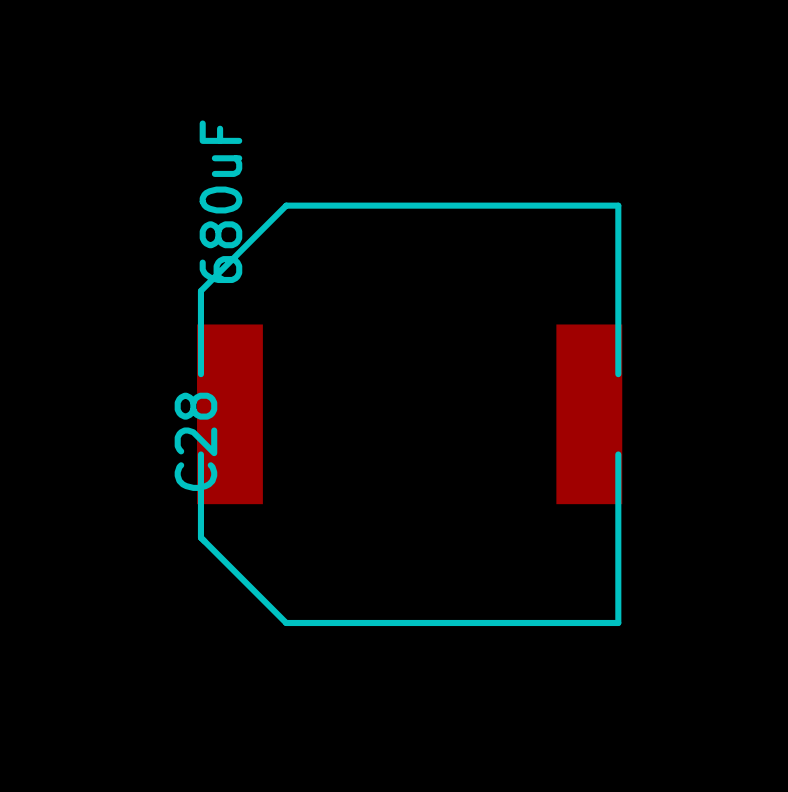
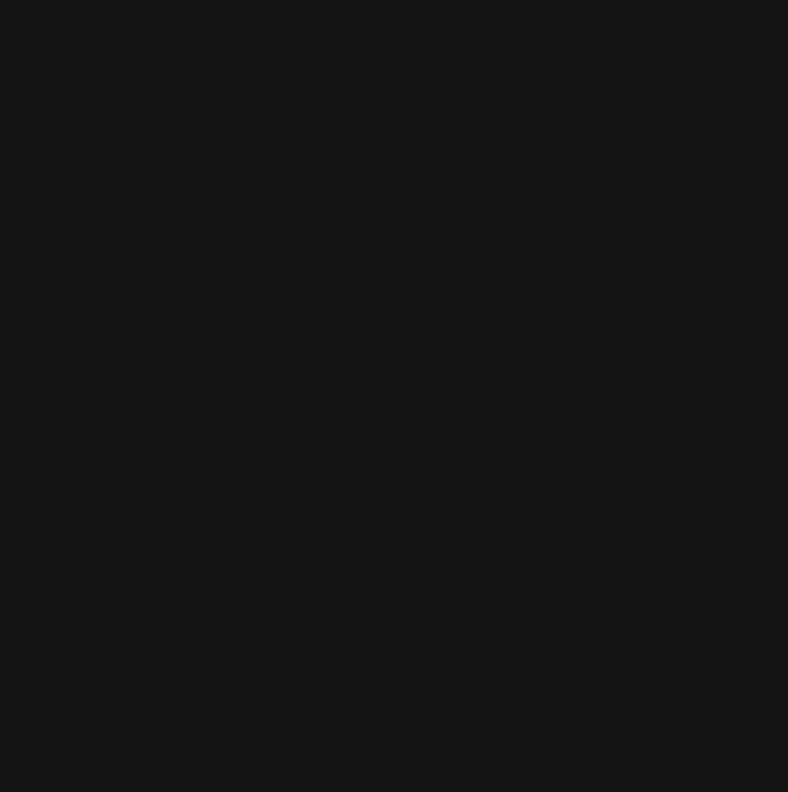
C28: 680uF (409, 414) -> none

